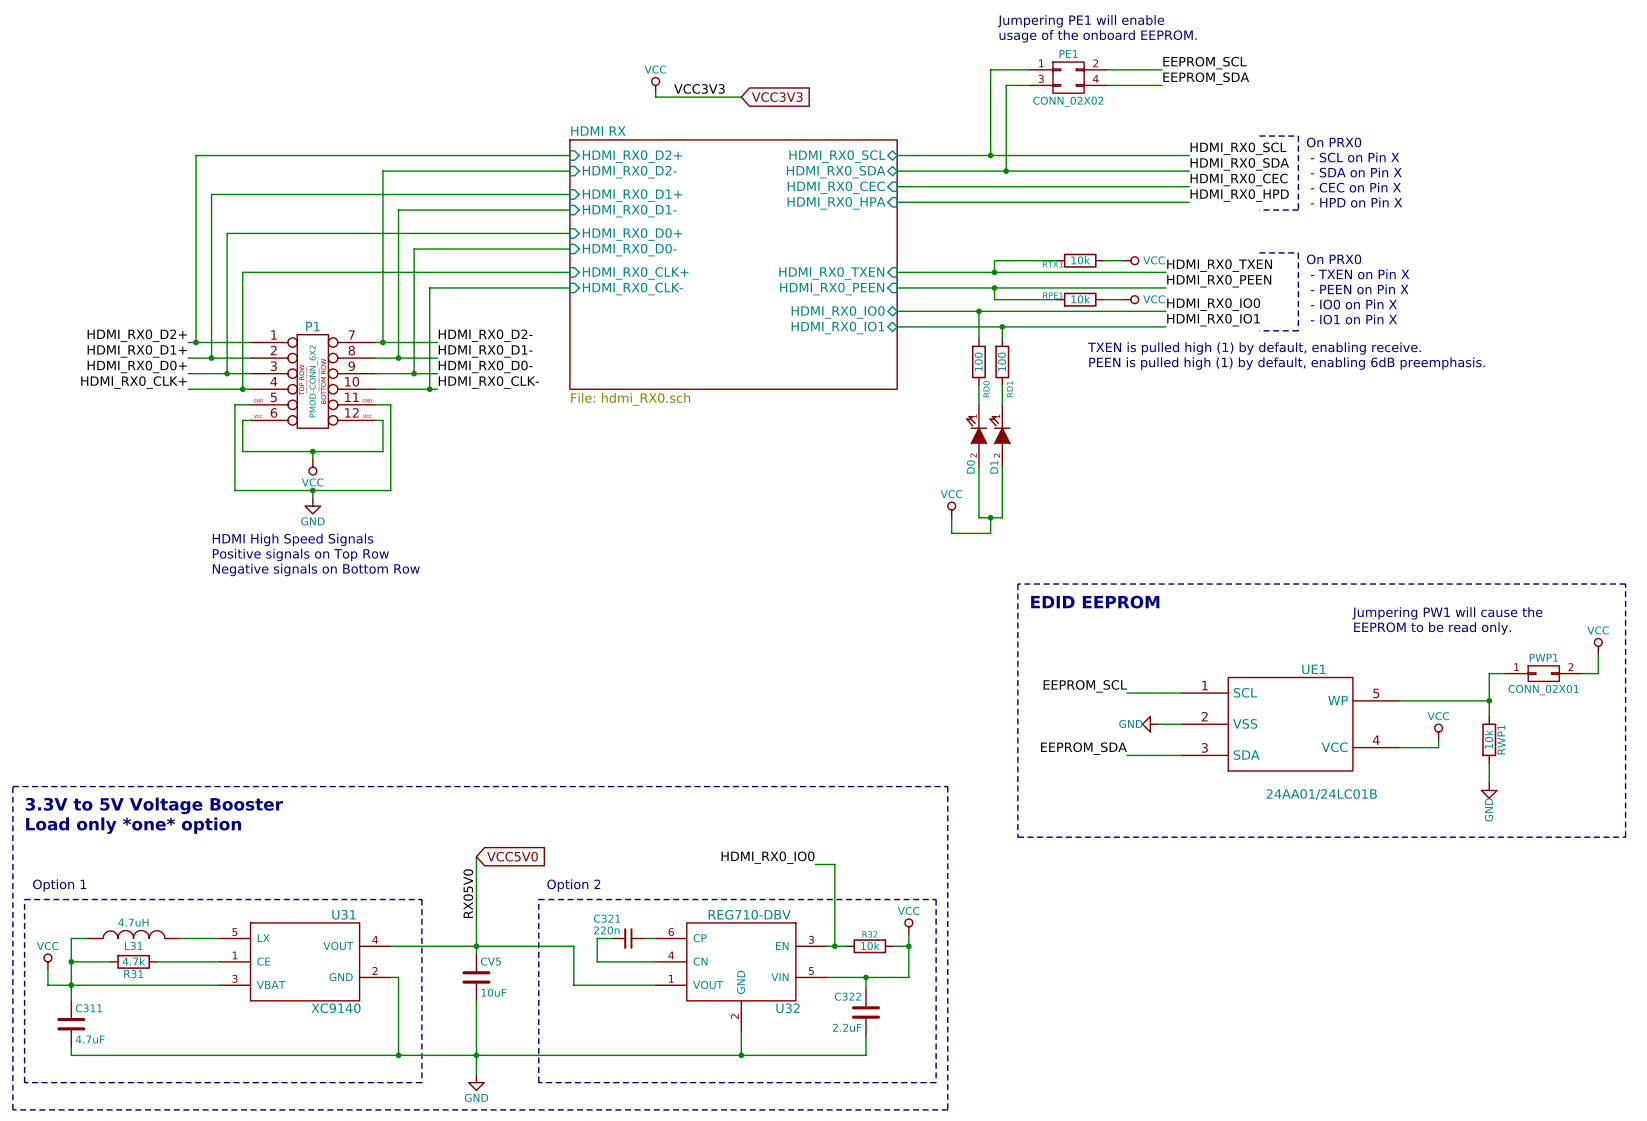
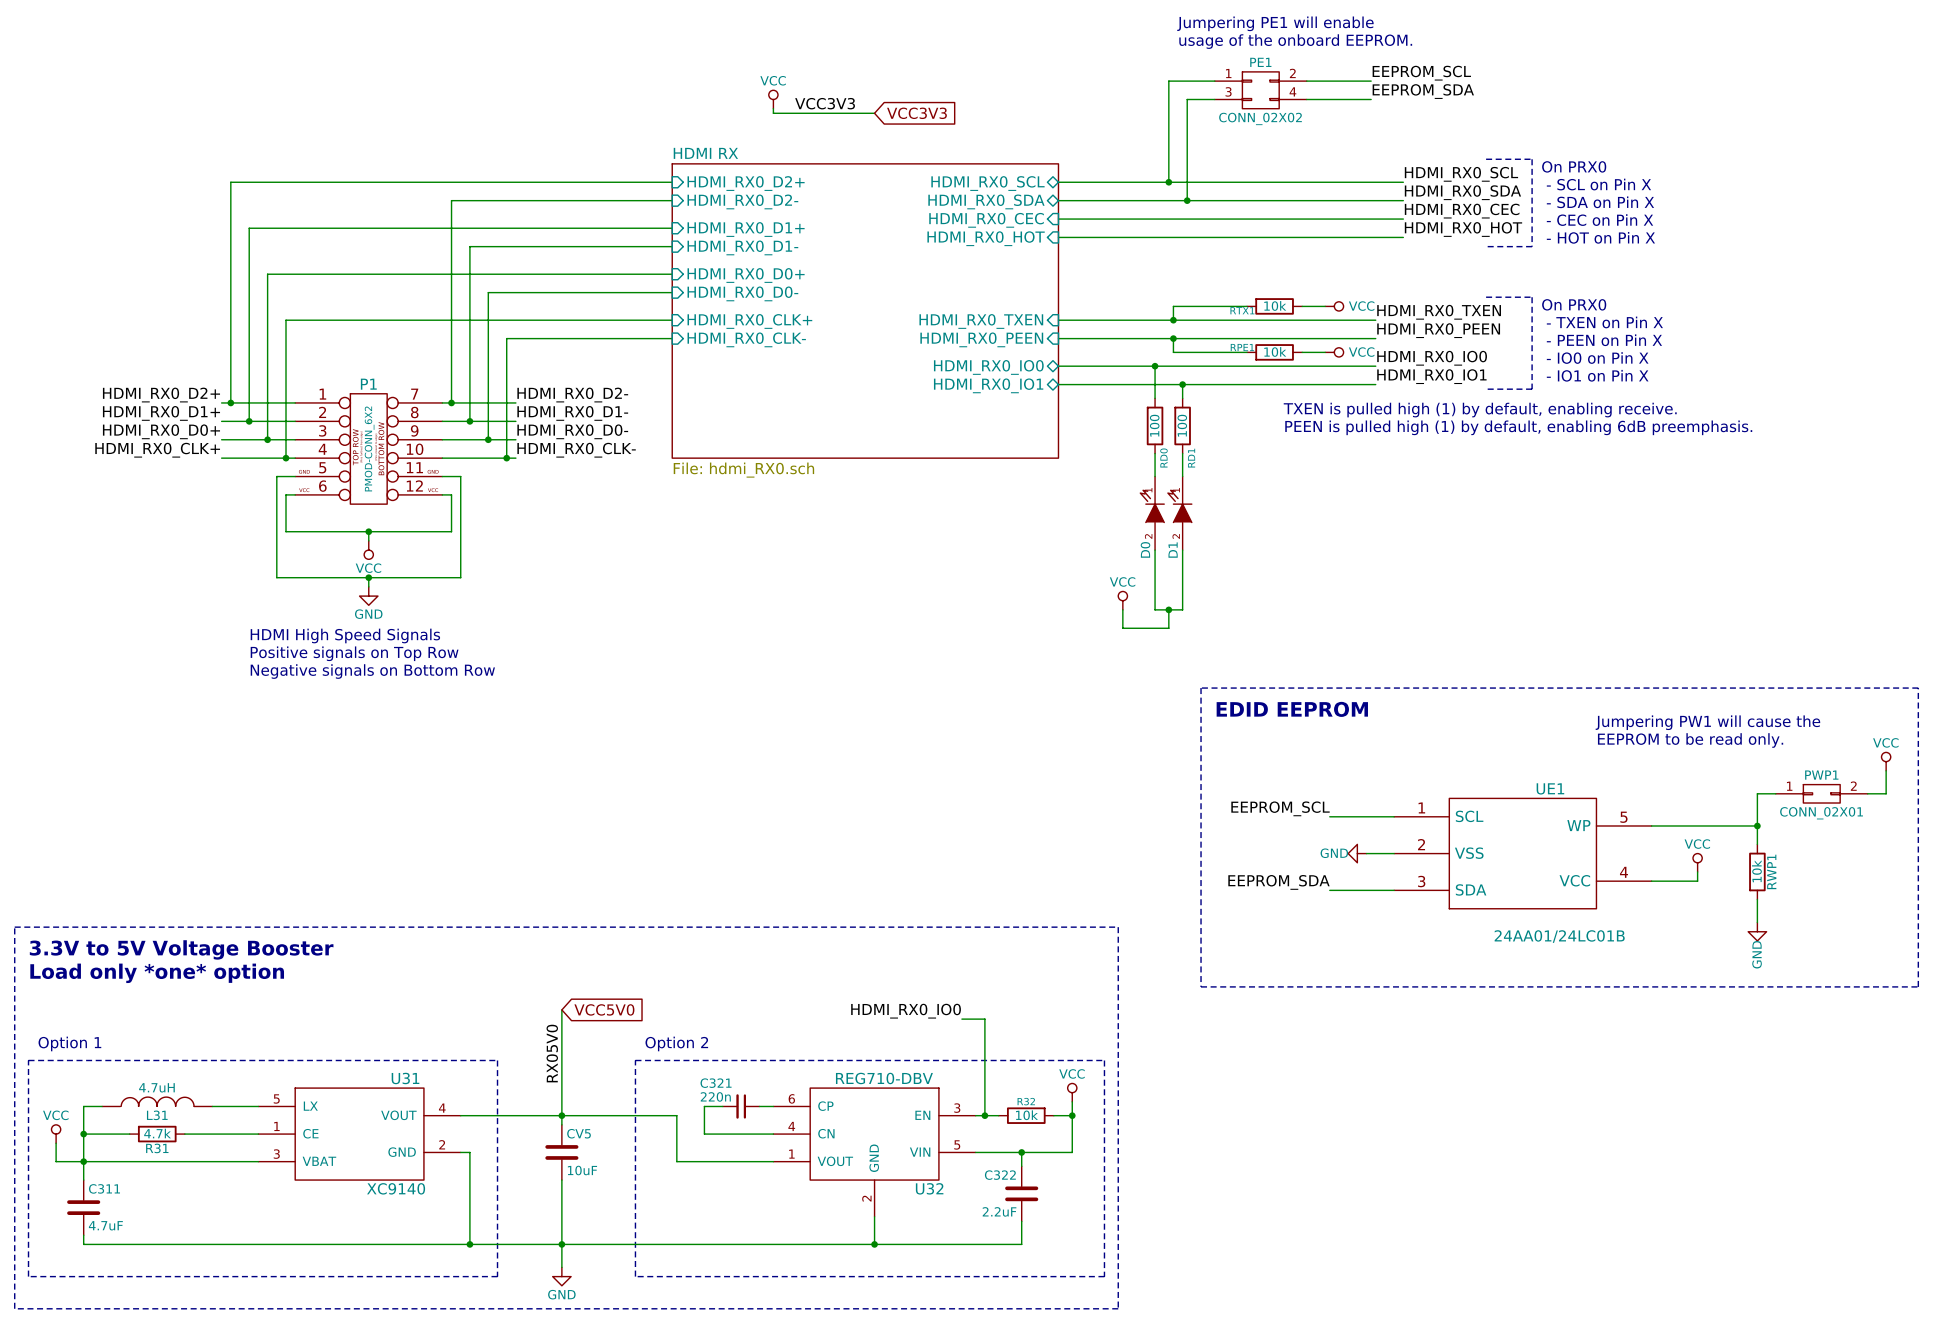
label: HDMI_RX0_HPD (1239, 195) -> HDMI_RX0_HOT (1463, 229)
text: - HPD on Pin X (1356, 202) -> - HOT on Pin X (1600, 237)
sheet pin: HDMI_RX0_HPA (836, 203) -> HDMI_RX0_HOT (986, 238)

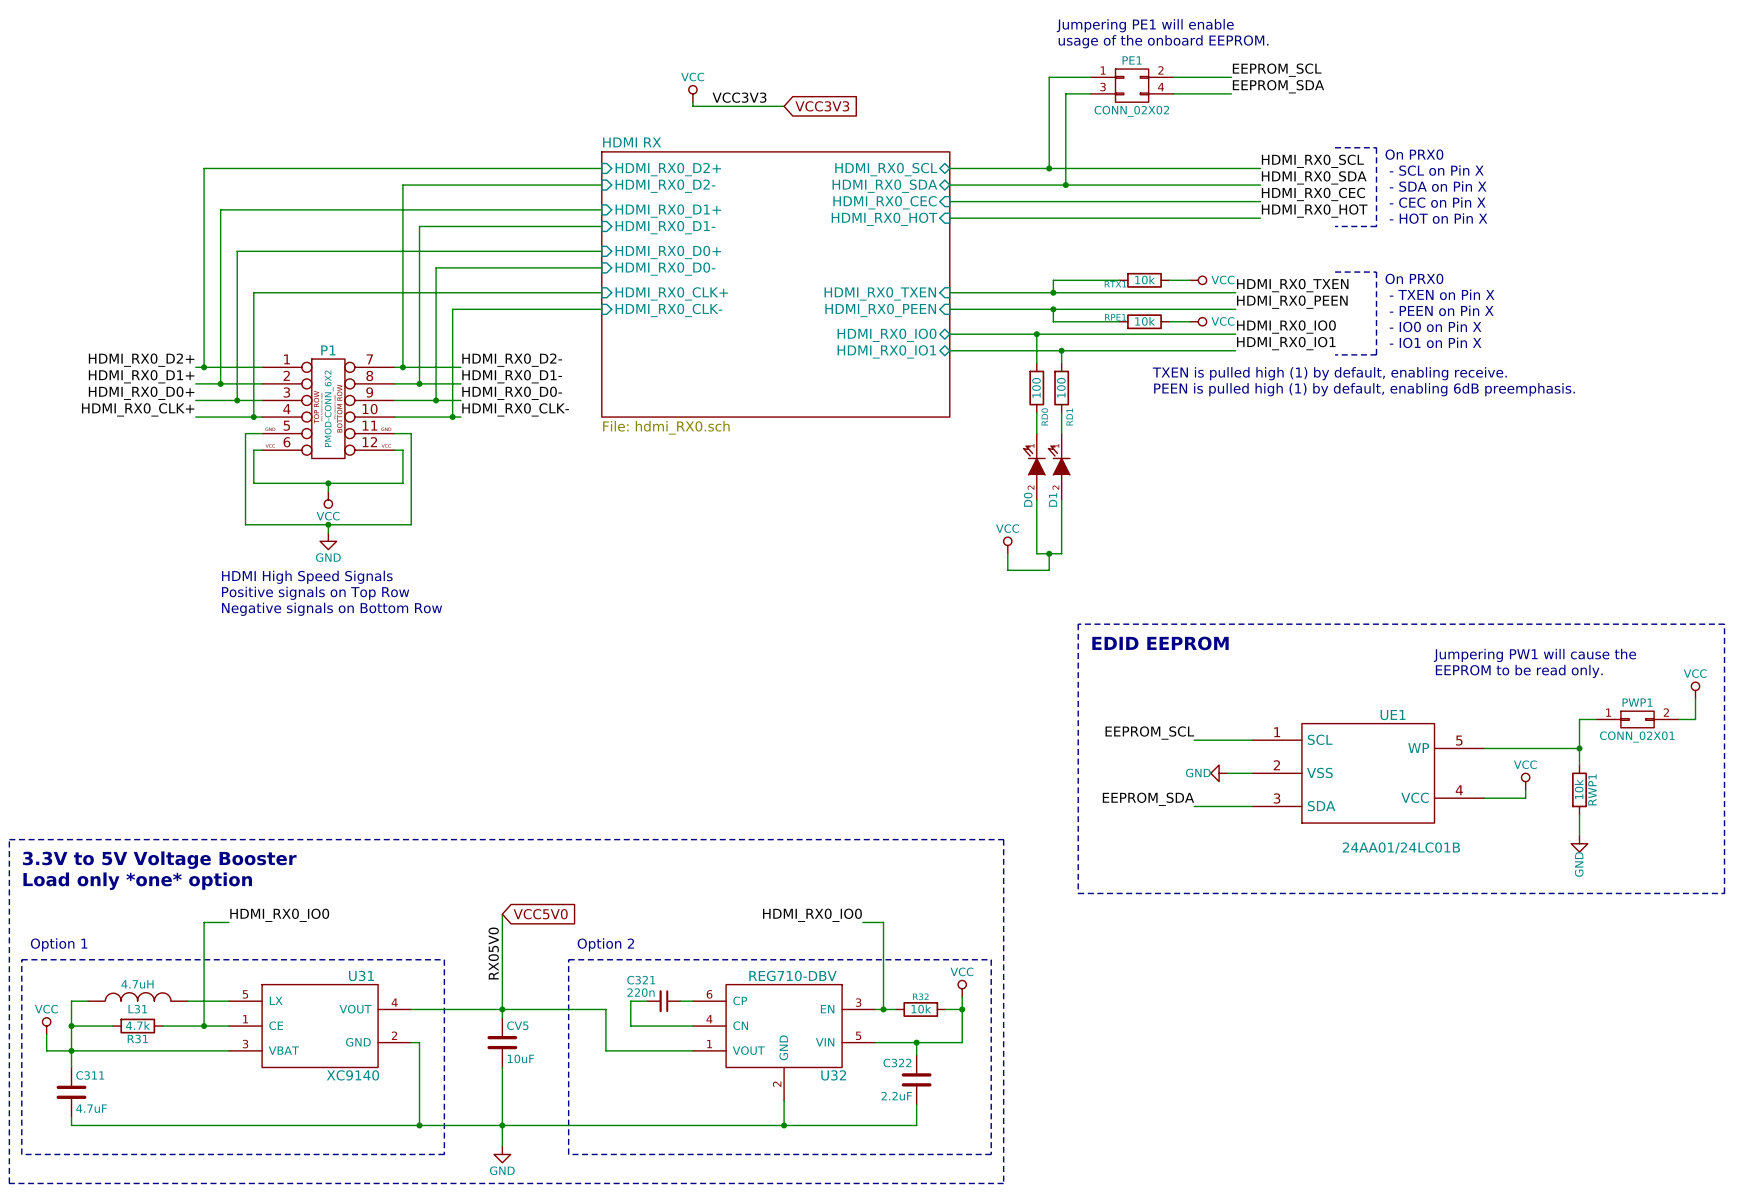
label: none -> HDMI_RX0_IO0 (279, 915)
wire: none -> (228, 922) (204, 922) (204, 1026)
junction: none -> (204, 1026)

